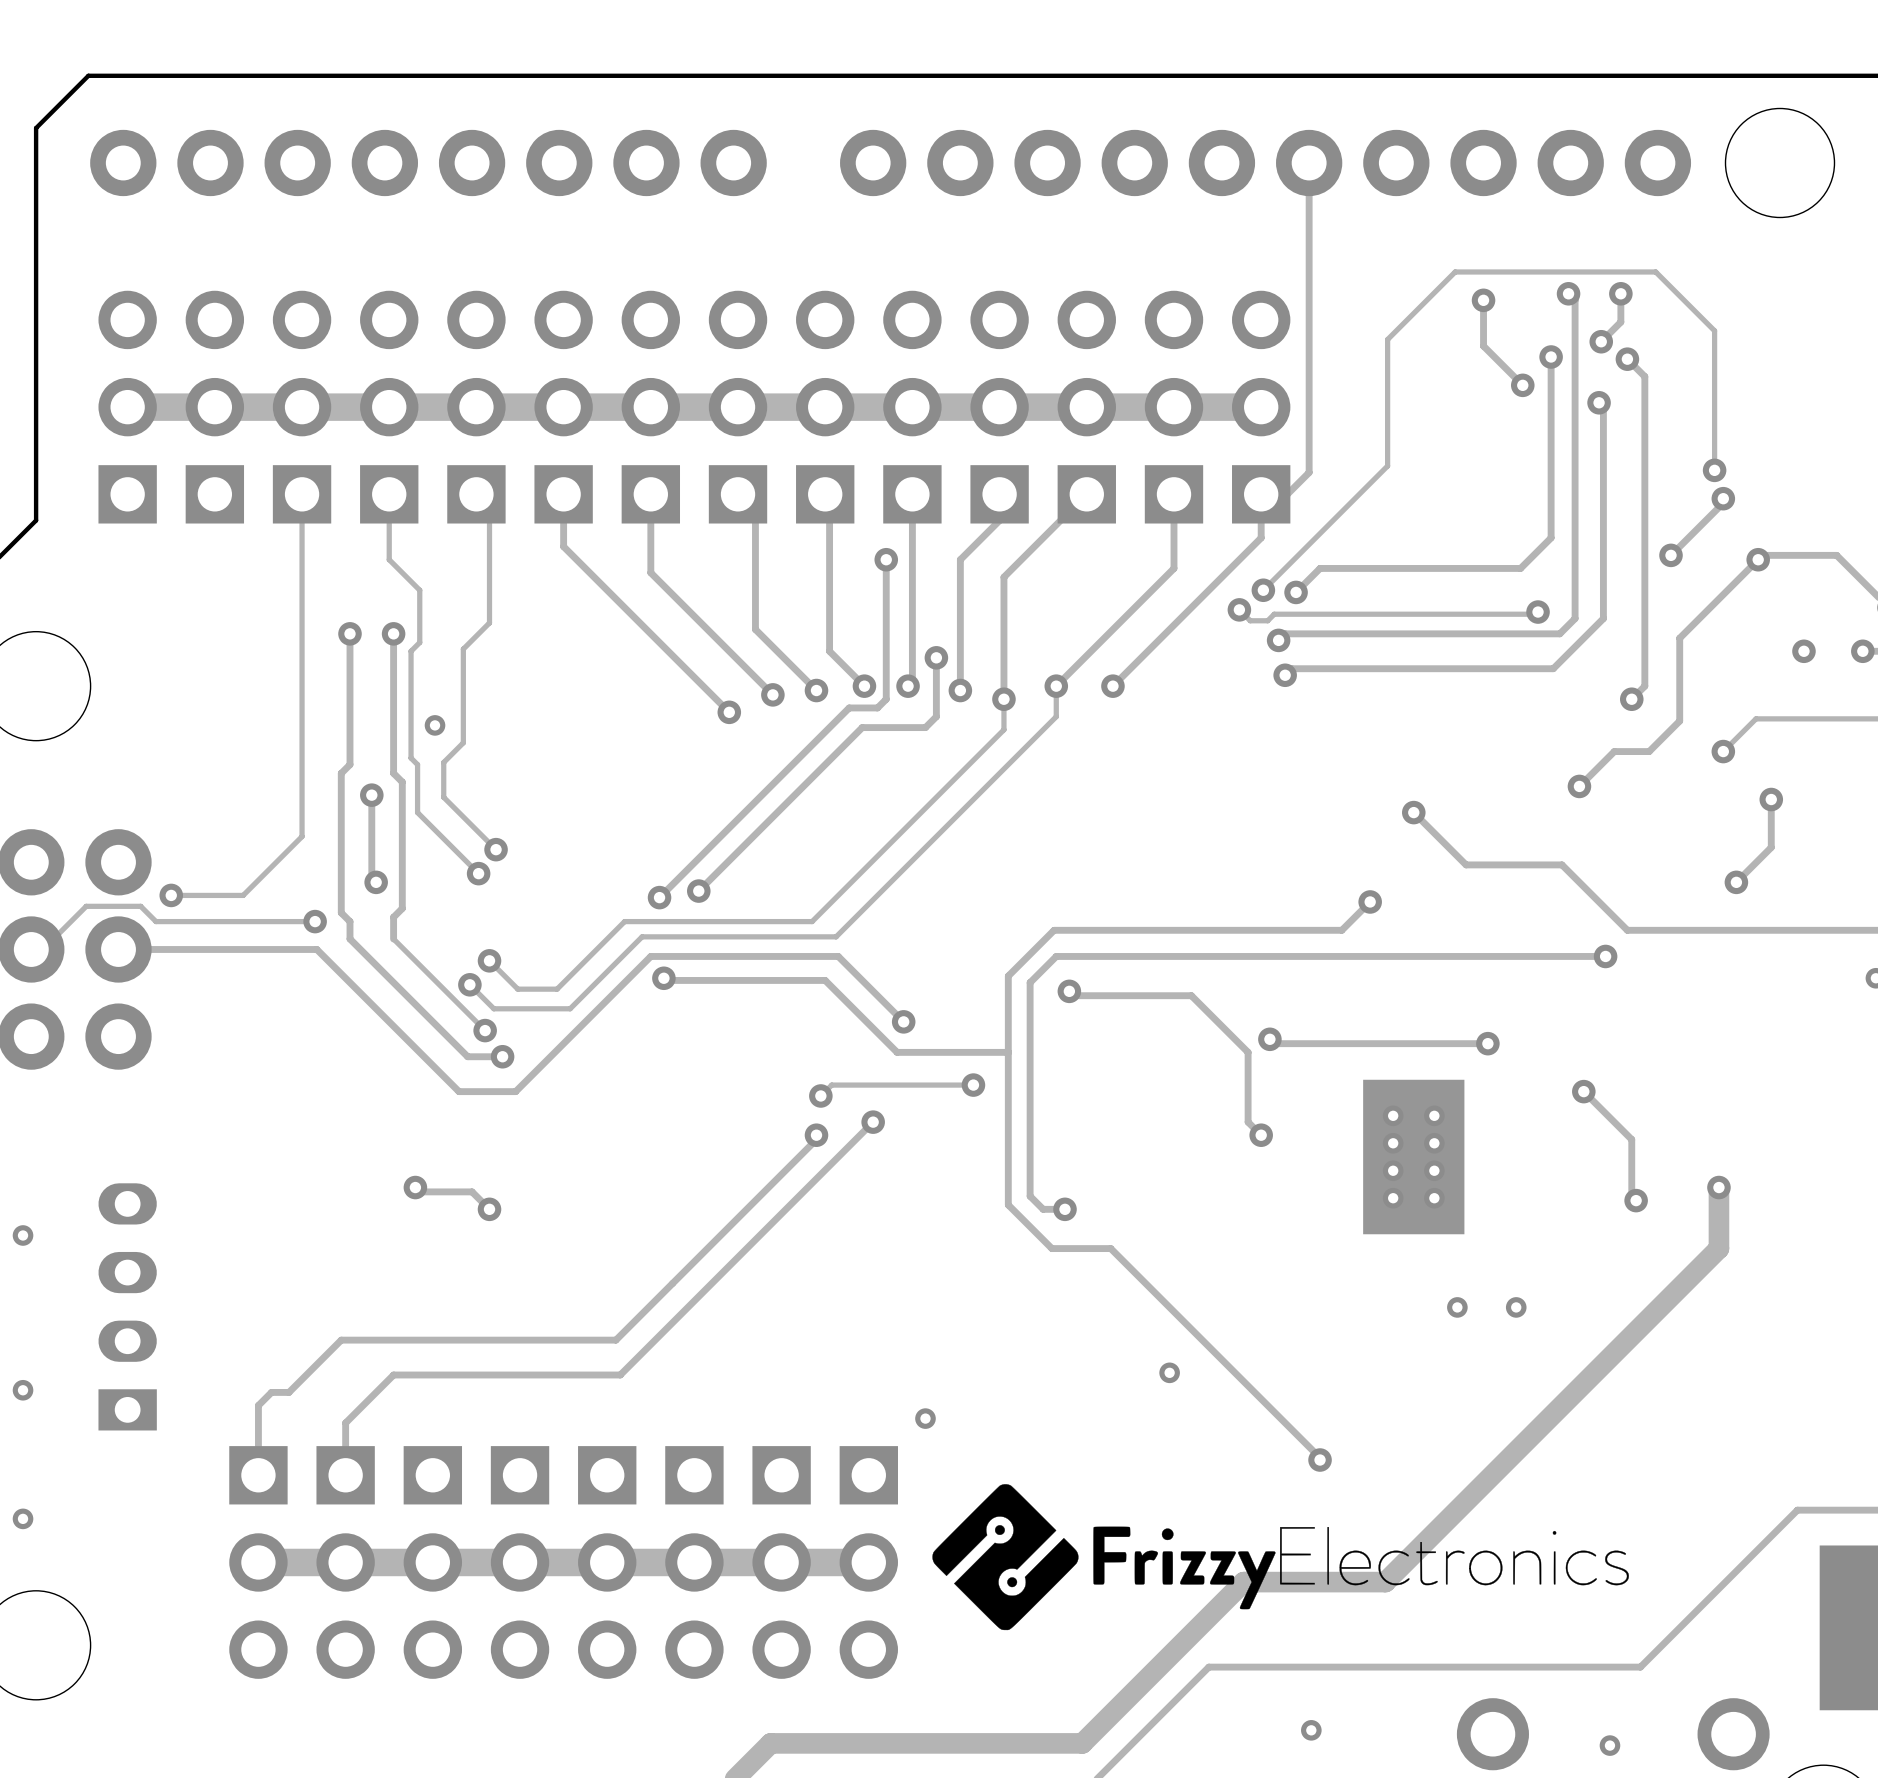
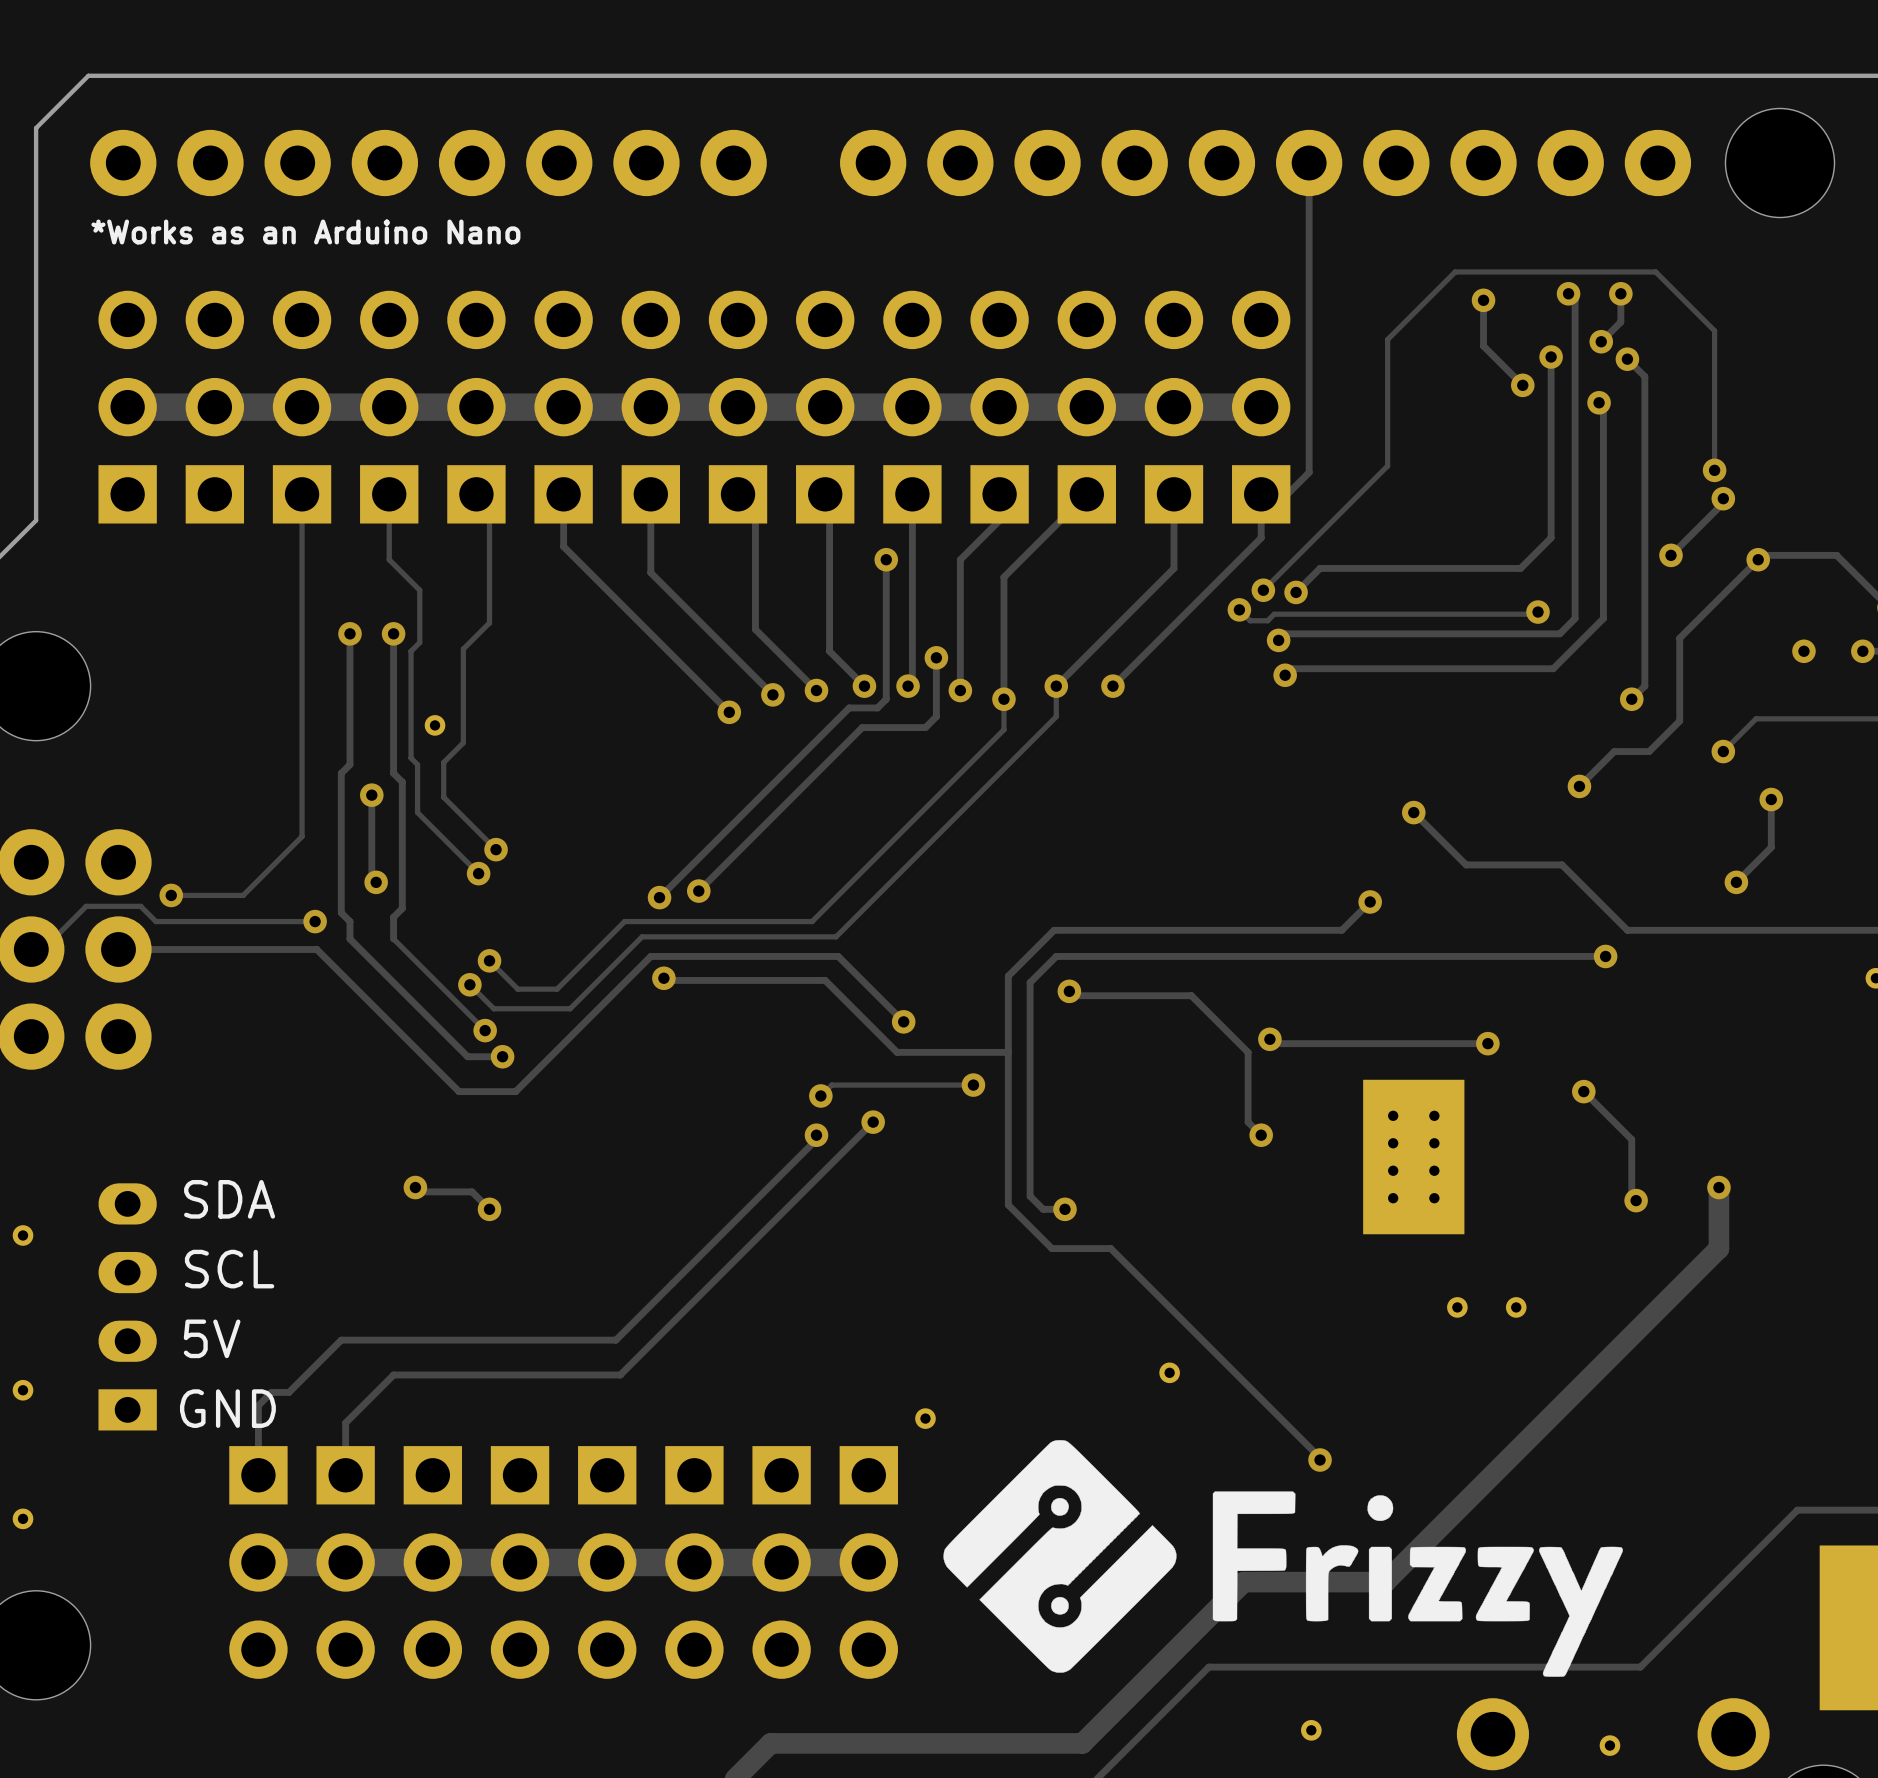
text: none -> *Works as an Arduino Nano (305, 231)
text: none -> SDA (229, 1199)
text: none -> SCL (229, 1269)
text: none -> 5V (212, 1338)
text: none -> GND (227, 1408)
drawing shape: [932, 1484, 1629, 1631] -> [943, 1440, 1623, 1677]

